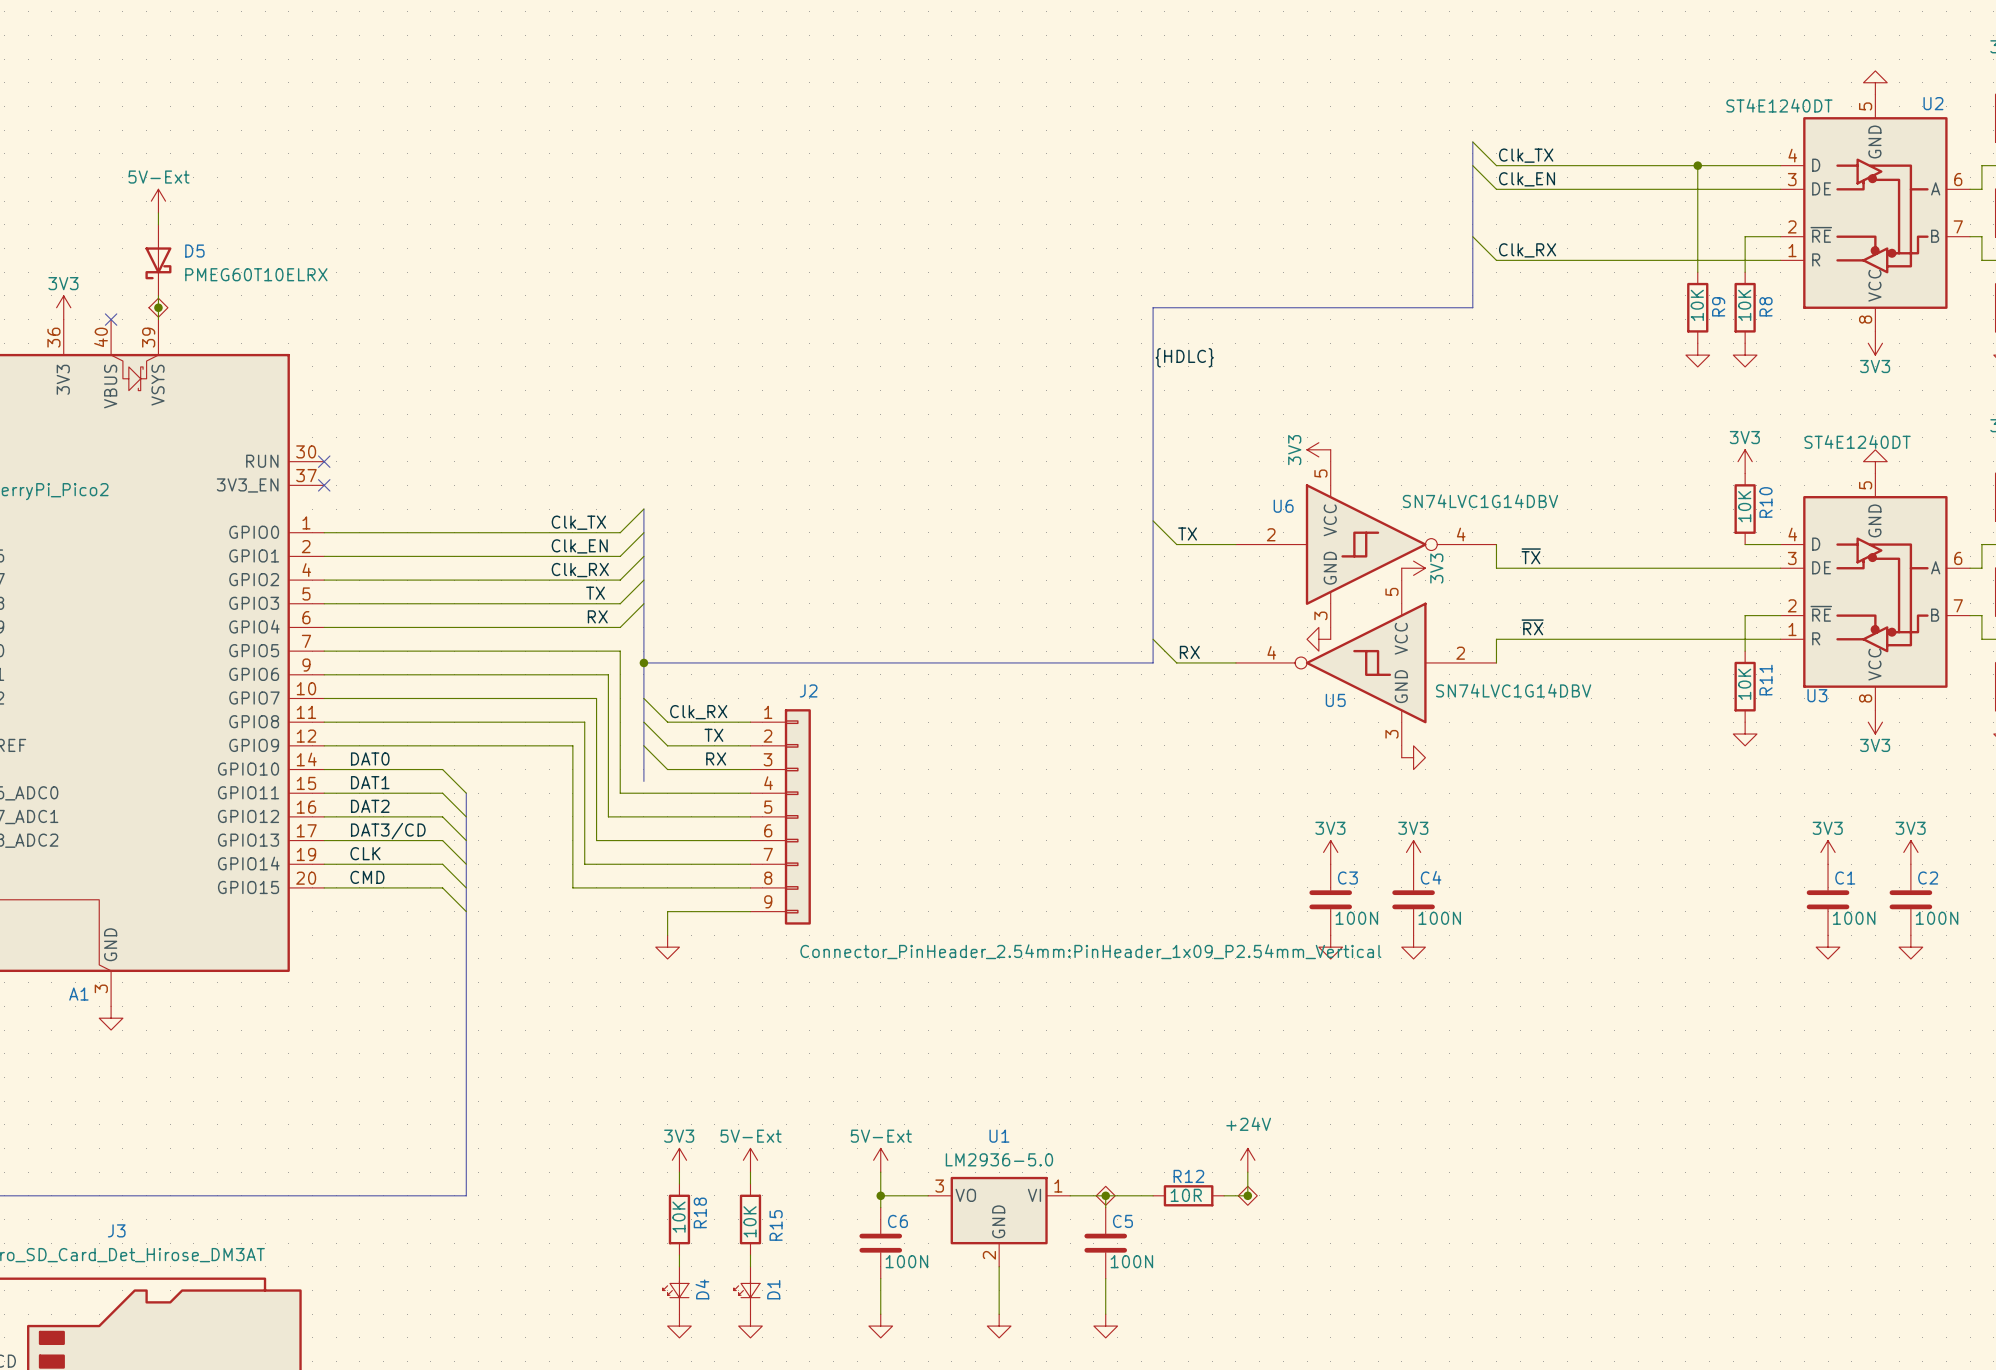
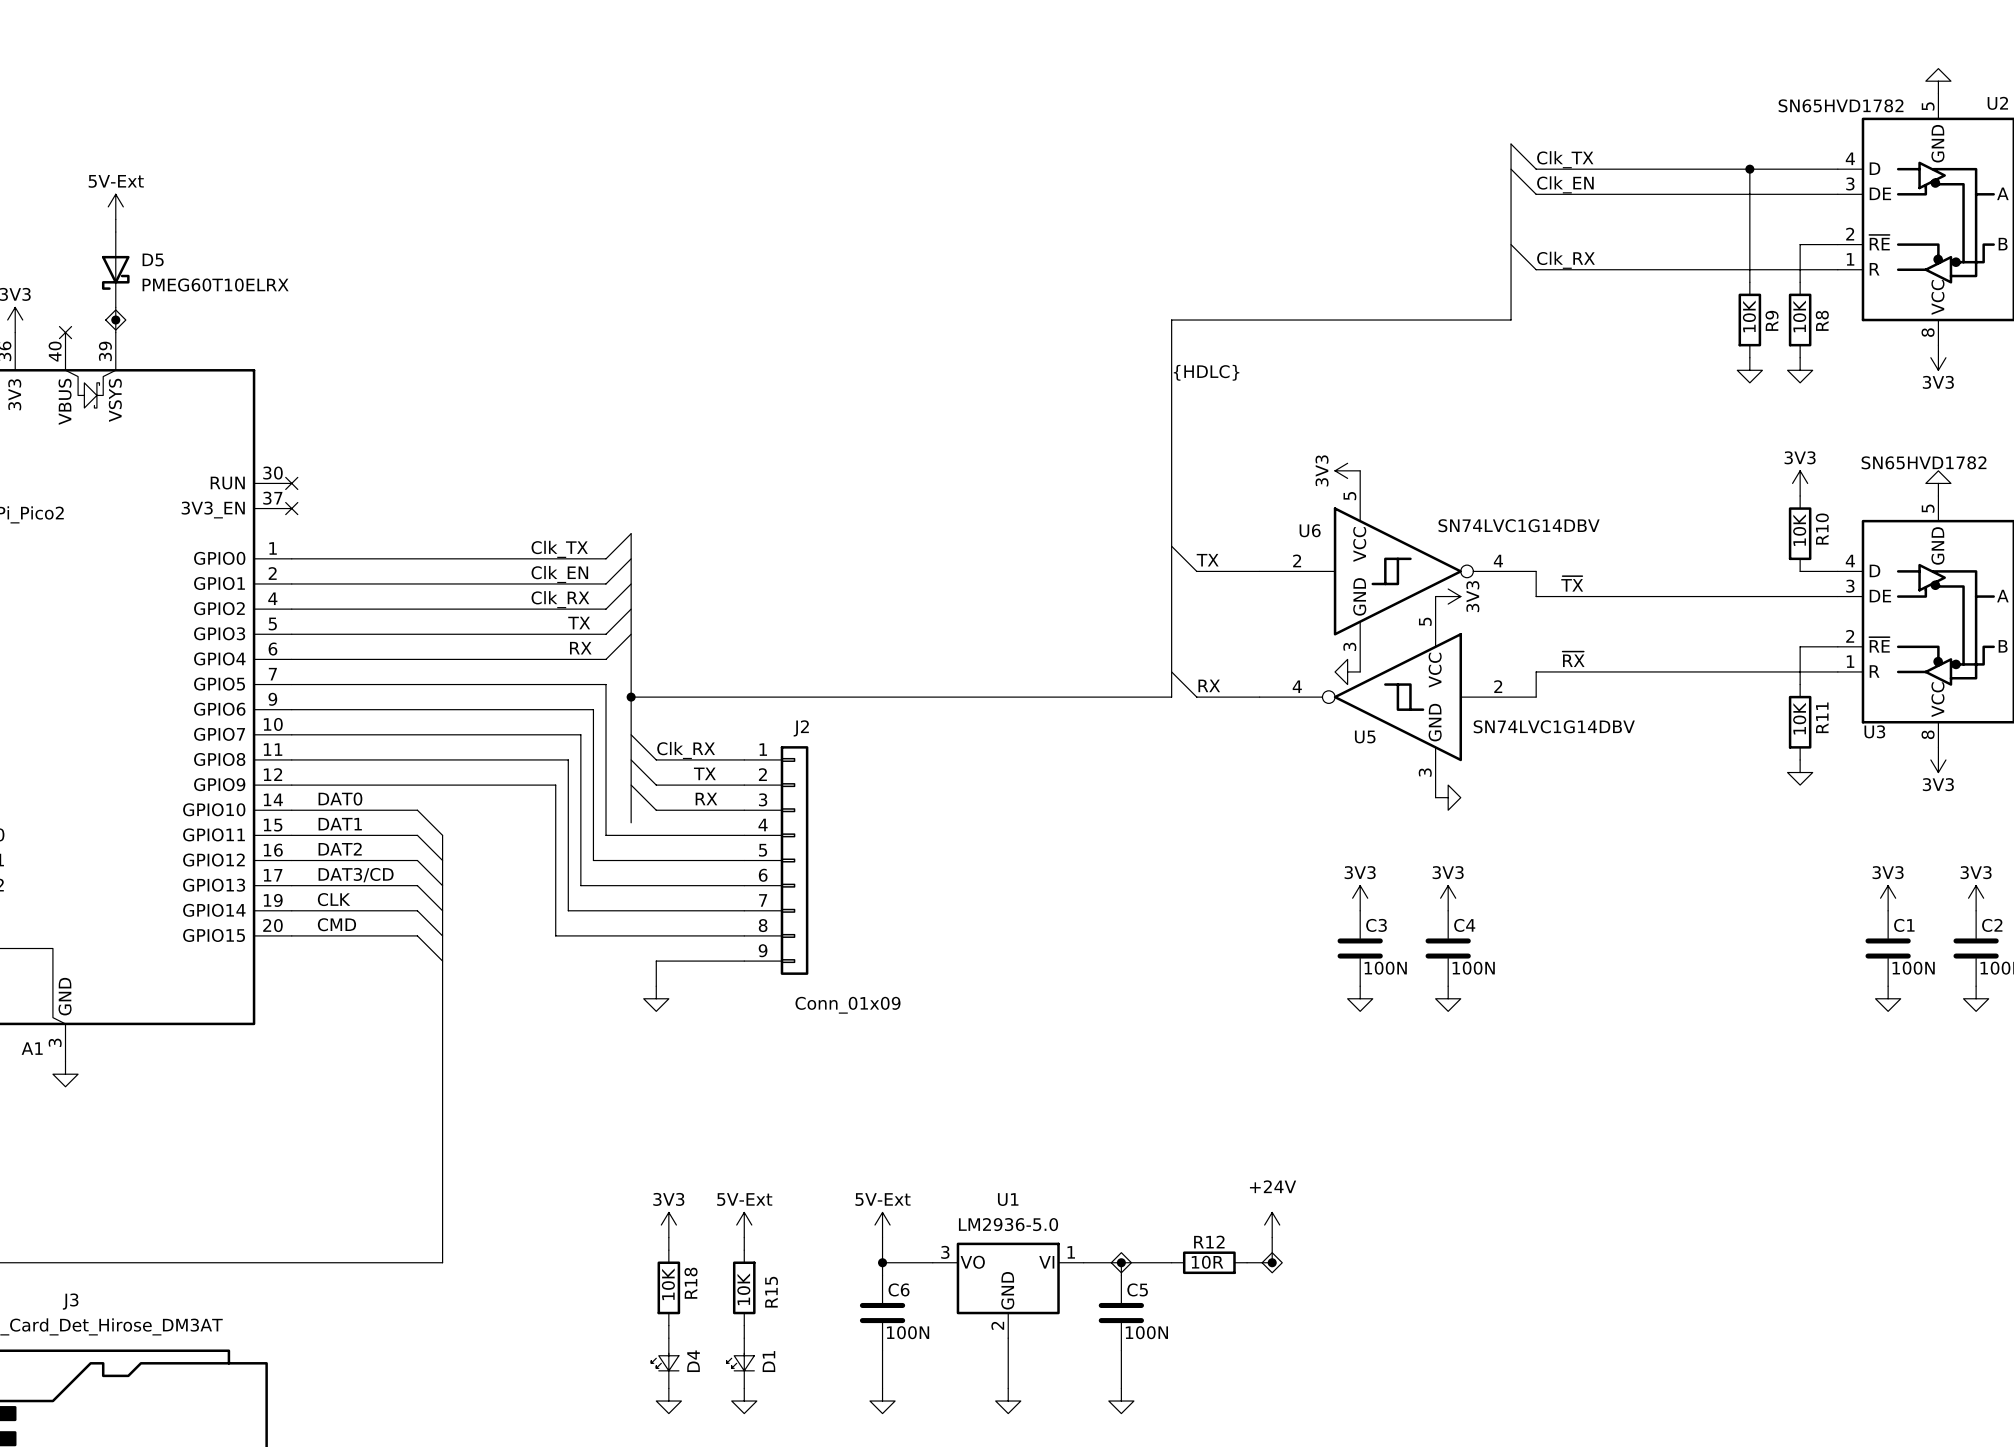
U2 value: ST4E1240DT (1779, 105) -> SN65HVD1782 (1841, 105)
U3 value: ST4E1240DT (1857, 442) -> SN65HVD1782 (1924, 462)
J2 value: Connector_PinHeader_2.54mm:PinHeader_1x09_P2.54mm_Vertical (1090, 951) -> Conn_01x09 (848, 1005)

